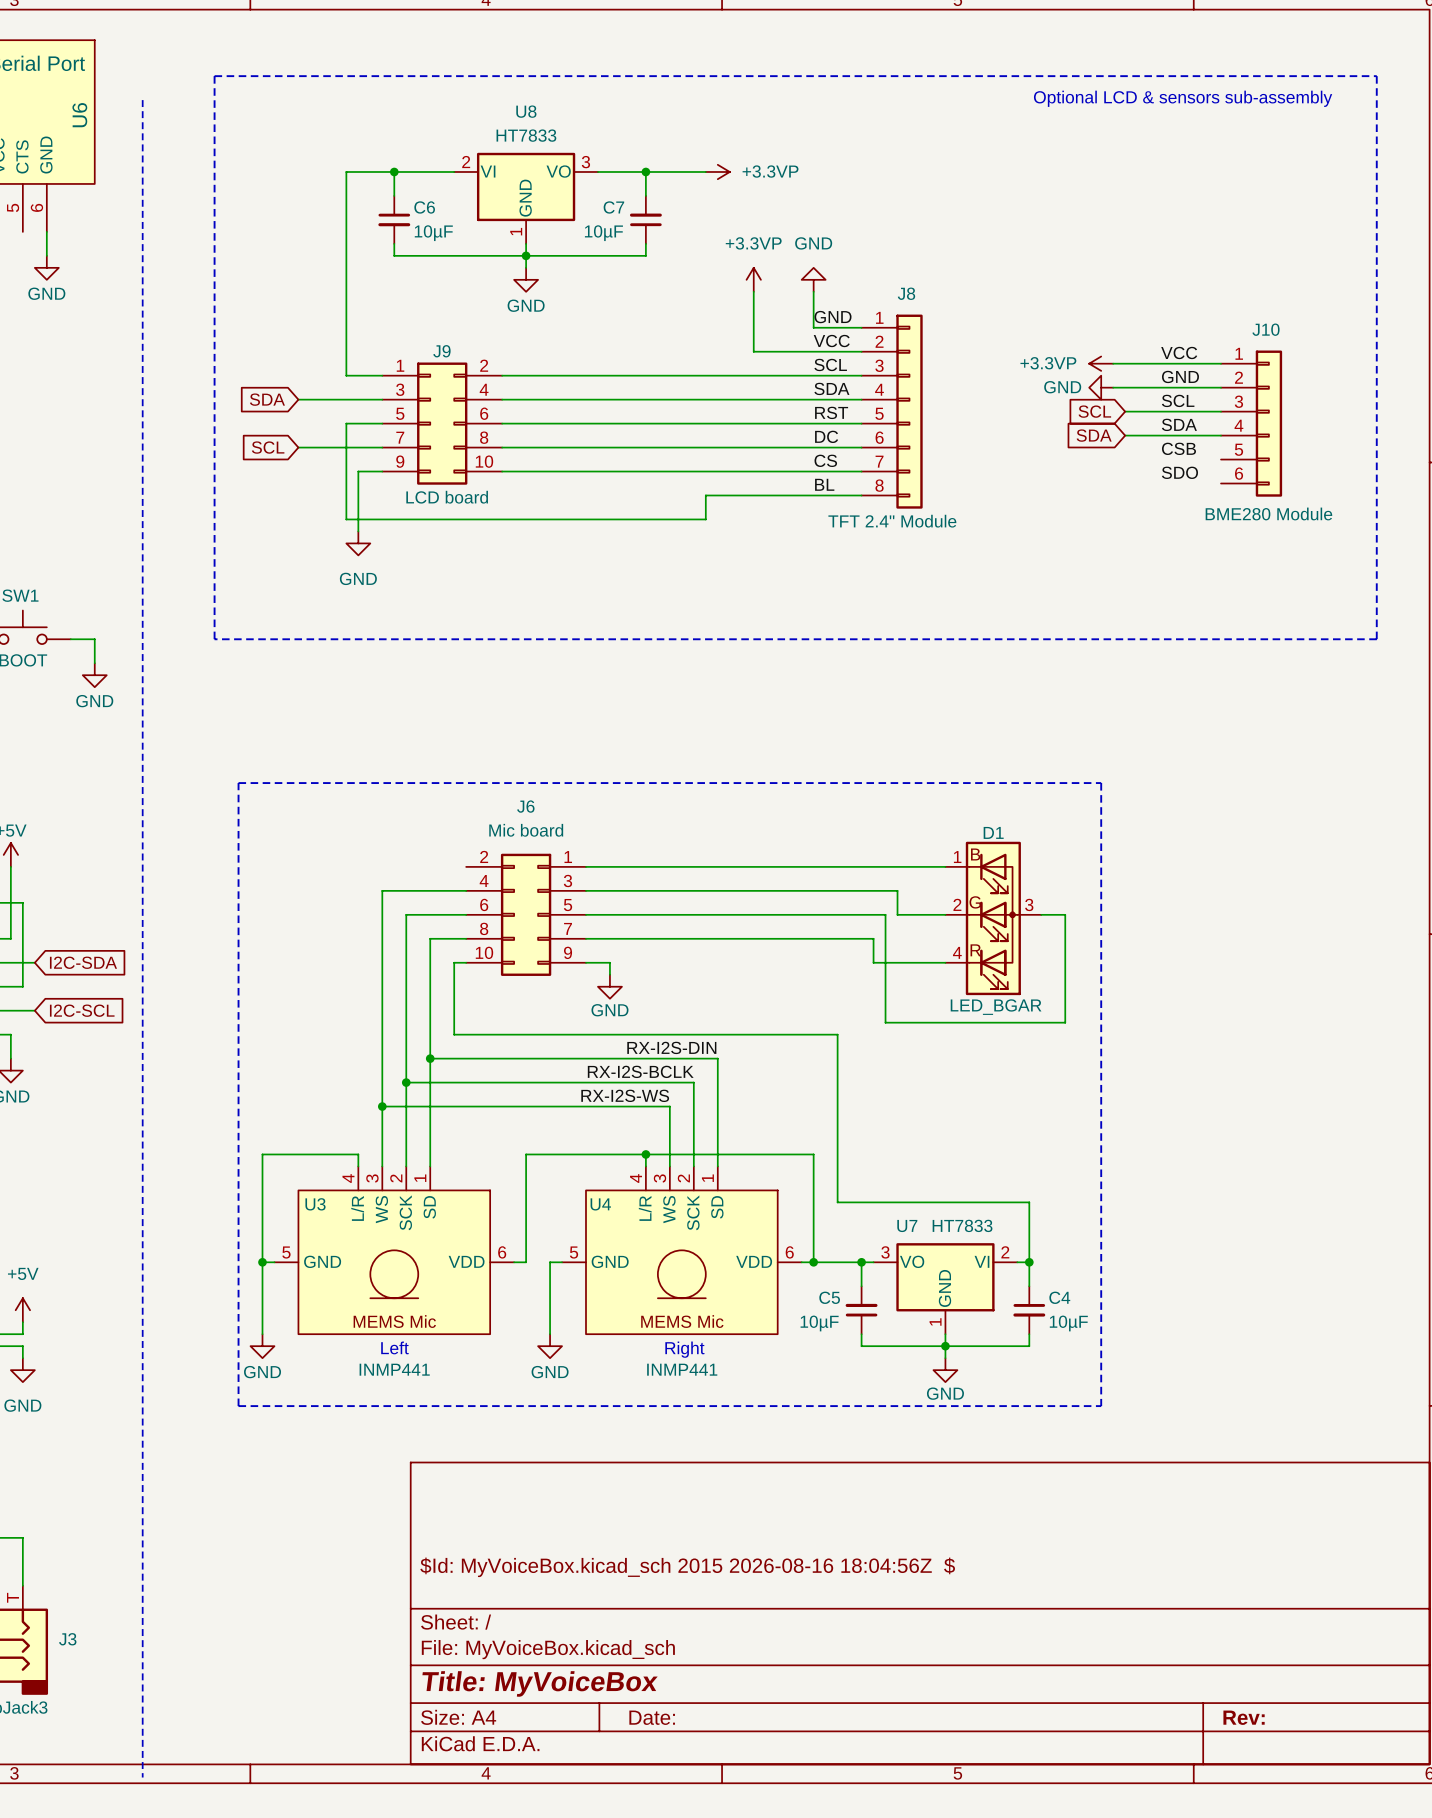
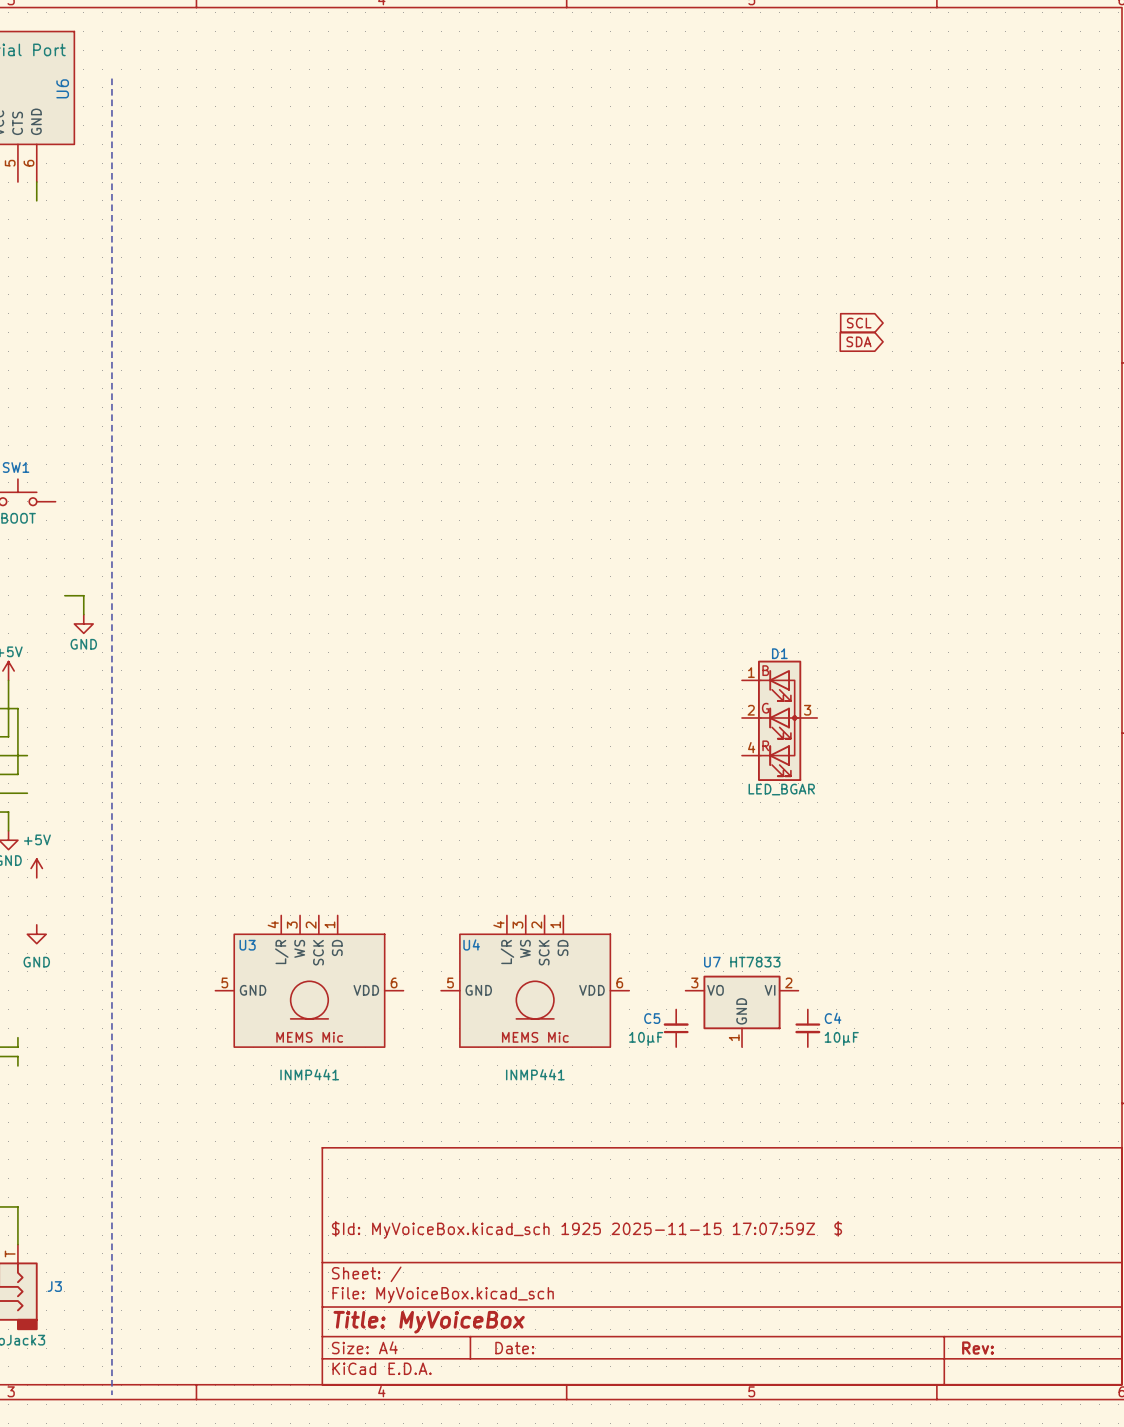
line: (214, 76) (1376, 76) (1376, 639) (214, 639) (214, 76) -> none
text: Optional LCD & sensors sub-assembly (1183, 98) -> none
wire: (394, 171) (394, 195) -> none
junction: (394, 171) -> none
wire: (454, 171) (346, 171) (346, 375) (382, 375) -> none
wire: (597, 171) (705, 171) -> none
wire: (645, 171) (645, 195) -> none
junction: (645, 171) -> none
power symbol: +3.3VP (717, 171) -> none
U8: HT7833 (526, 198) -> none
C6: 10µF (394, 219) -> none
C7: 10µF (645, 219) -> none
wire: (394, 243) (394, 255) (645, 255) (645, 243) -> none
wire: (526, 243) (526, 267) -> none
junction: (526, 255) -> none
power symbol: GND (46, 267) -> none
power symbol: GND (526, 279) -> none
power symbol: +3.3VP (753, 279) -> none
power symbol: GND (813, 279) -> none
wire: (753, 291) (753, 351) (861, 351) -> none
wire: (813, 291) (813, 327) (861, 327) -> none
label: GND (833, 317) -> none
label: VCC (831, 341) -> none
label: VCC (1179, 353) -> none
power symbol: +3.3VP (1101, 363) -> none
wire: (1113, 363) (1221, 363) -> none
label: SCL (830, 364) -> none
wire: (502, 375) (861, 375) -> none
label: GND (1180, 376) -> none
power symbol: GND (1101, 387) -> none
wire: (1113, 387) (1221, 387) -> none
label: SDA (831, 388) -> none
global label: SDA (267, 399) -> none
wire: (298, 399) (382, 399) -> none
wire: (502, 399) (861, 399) -> none
label: SCL (1178, 400) -> none
J8: TFT 2.4" Module (892, 411) -> none
wire: (1125, 411) (1221, 411) -> none
label: RST (831, 412) -> none
wire: (382, 423) (346, 423) (346, 519) (705, 519) (705, 495) (861, 495) -> none
J9: LCD board (442, 423) -> none
wire: (502, 423) (861, 423) -> none
J10: BME280 Module (1251, 423) -> none
label: SDA (1179, 424) -> none
wire: (1125, 435) (1221, 435) -> none
label: DC (826, 436) -> none
global label: SCL (268, 447) -> none
wire: (298, 447) (382, 447) -> none
wire: (502, 447) (861, 447) -> none
label: CSB (1178, 448) -> none
label: CS (825, 460) -> none
wire: (382, 471) (358, 471) (358, 531) -> none
wire: (502, 471) (861, 471) -> none
label: SDO (1179, 472) -> none
label: BL (824, 484) -> none
power symbol: GND (358, 543) -> none
wire: (70, 639) (94, 639) (94, 663) -> (64, 595) (83, 595) (83, 614)
power symbol: GND (94, 675) -> none
line: (238, 783) (1101, 783) (1101, 1406) (238, 1406) (238, 783) -> none
power symbol: none -> GND (83, 623)
wire: (585, 866) (945, 866) -> none
wire: (466, 890) (382, 890) (382, 1166) -> none
wire: (585, 890) (897, 890) (897, 914) (945, 914) -> none
wire: (466, 914) (406, 914) (406, 1166) -> none
J6: Mic board (526, 914) -> none
wire: (585, 914) (885, 914) (885, 1022) (1065, 1022) (1065, 914) (1041, 914) -> none
wire: (466, 938) (430, 938) (430, 1166) -> none
wire: (585, 938) (873, 938) (873, 962) (945, 962) -> none
global label: I2C-SDA (83, 962) -> none
wire: (466, 962) (454, 962) (454, 1034) (837, 1034) (837, 1202) (1029, 1202) (1029, 1286) -> none
wire: (585, 962) (609, 962) (609, 974) -> none
power symbol: GND (609, 986) -> none
global label: I2C-SCL (82, 1010) -> none
label: RX-I2S-DIN (671, 1047) -> none
wire: (430, 1058) (717, 1058) (717, 1166) -> none
junction: (430, 1058) -> none
label: RX-I2S-BCLK (640, 1071) -> none
wire: (406, 1082) (693, 1082) (693, 1166) -> none
junction: (406, 1082) -> none
label: RX-I2S-WS (625, 1095) -> none
wire: (382, 1106) (669, 1106) (669, 1166) -> none
junction: (382, 1106) -> none
wire: (645, 1154) (645, 1166) -> none
junction: (645, 1154) -> none
wire: (358, 1166) (358, 1154) (262, 1154) (262, 1334) -> none
power symbol: none -> GND (36, 934)
wire: (262, 1262) (274, 1262) -> none
junction: (262, 1262) -> none
wire: (514, 1262) (526, 1262) (526, 1154) (813, 1154) (813, 1262) -> none
wire: (562, 1262) (550, 1262) (550, 1334) -> none
wire: (801, 1262) (873, 1262) -> none
junction: (813, 1262) -> none
wire: (861, 1262) (861, 1286) -> none
junction: (861, 1262) -> none
wire: (1017, 1262) (1029, 1262) -> none
junction: (1029, 1262) -> none
power symbol position: +5V (22, 1310) -> +5V (36, 868)
wire: (861, 1334) (861, 1346) (1029, 1346) (1029, 1334) -> none
wire: (945, 1334) (945, 1358) -> none
power symbol: GND (262, 1346) -> none
power symbol: GND (550, 1346) -> none
junction: (945, 1346) -> none
text: Left (394, 1347) -> none
text: Right (684, 1349) -> none
power symbol: GND (22, 1370) -> none
power symbol: GND (945, 1370) -> none
title block: $Id: MyVoiceBox.kicad_sch 2015 2026-08-16 18:04:56Z $ (687, 1567) -> $Id: MyVoiceBox.kicad_sch 1925 2025-11-15 17:07:59Z $ (586, 1229)

